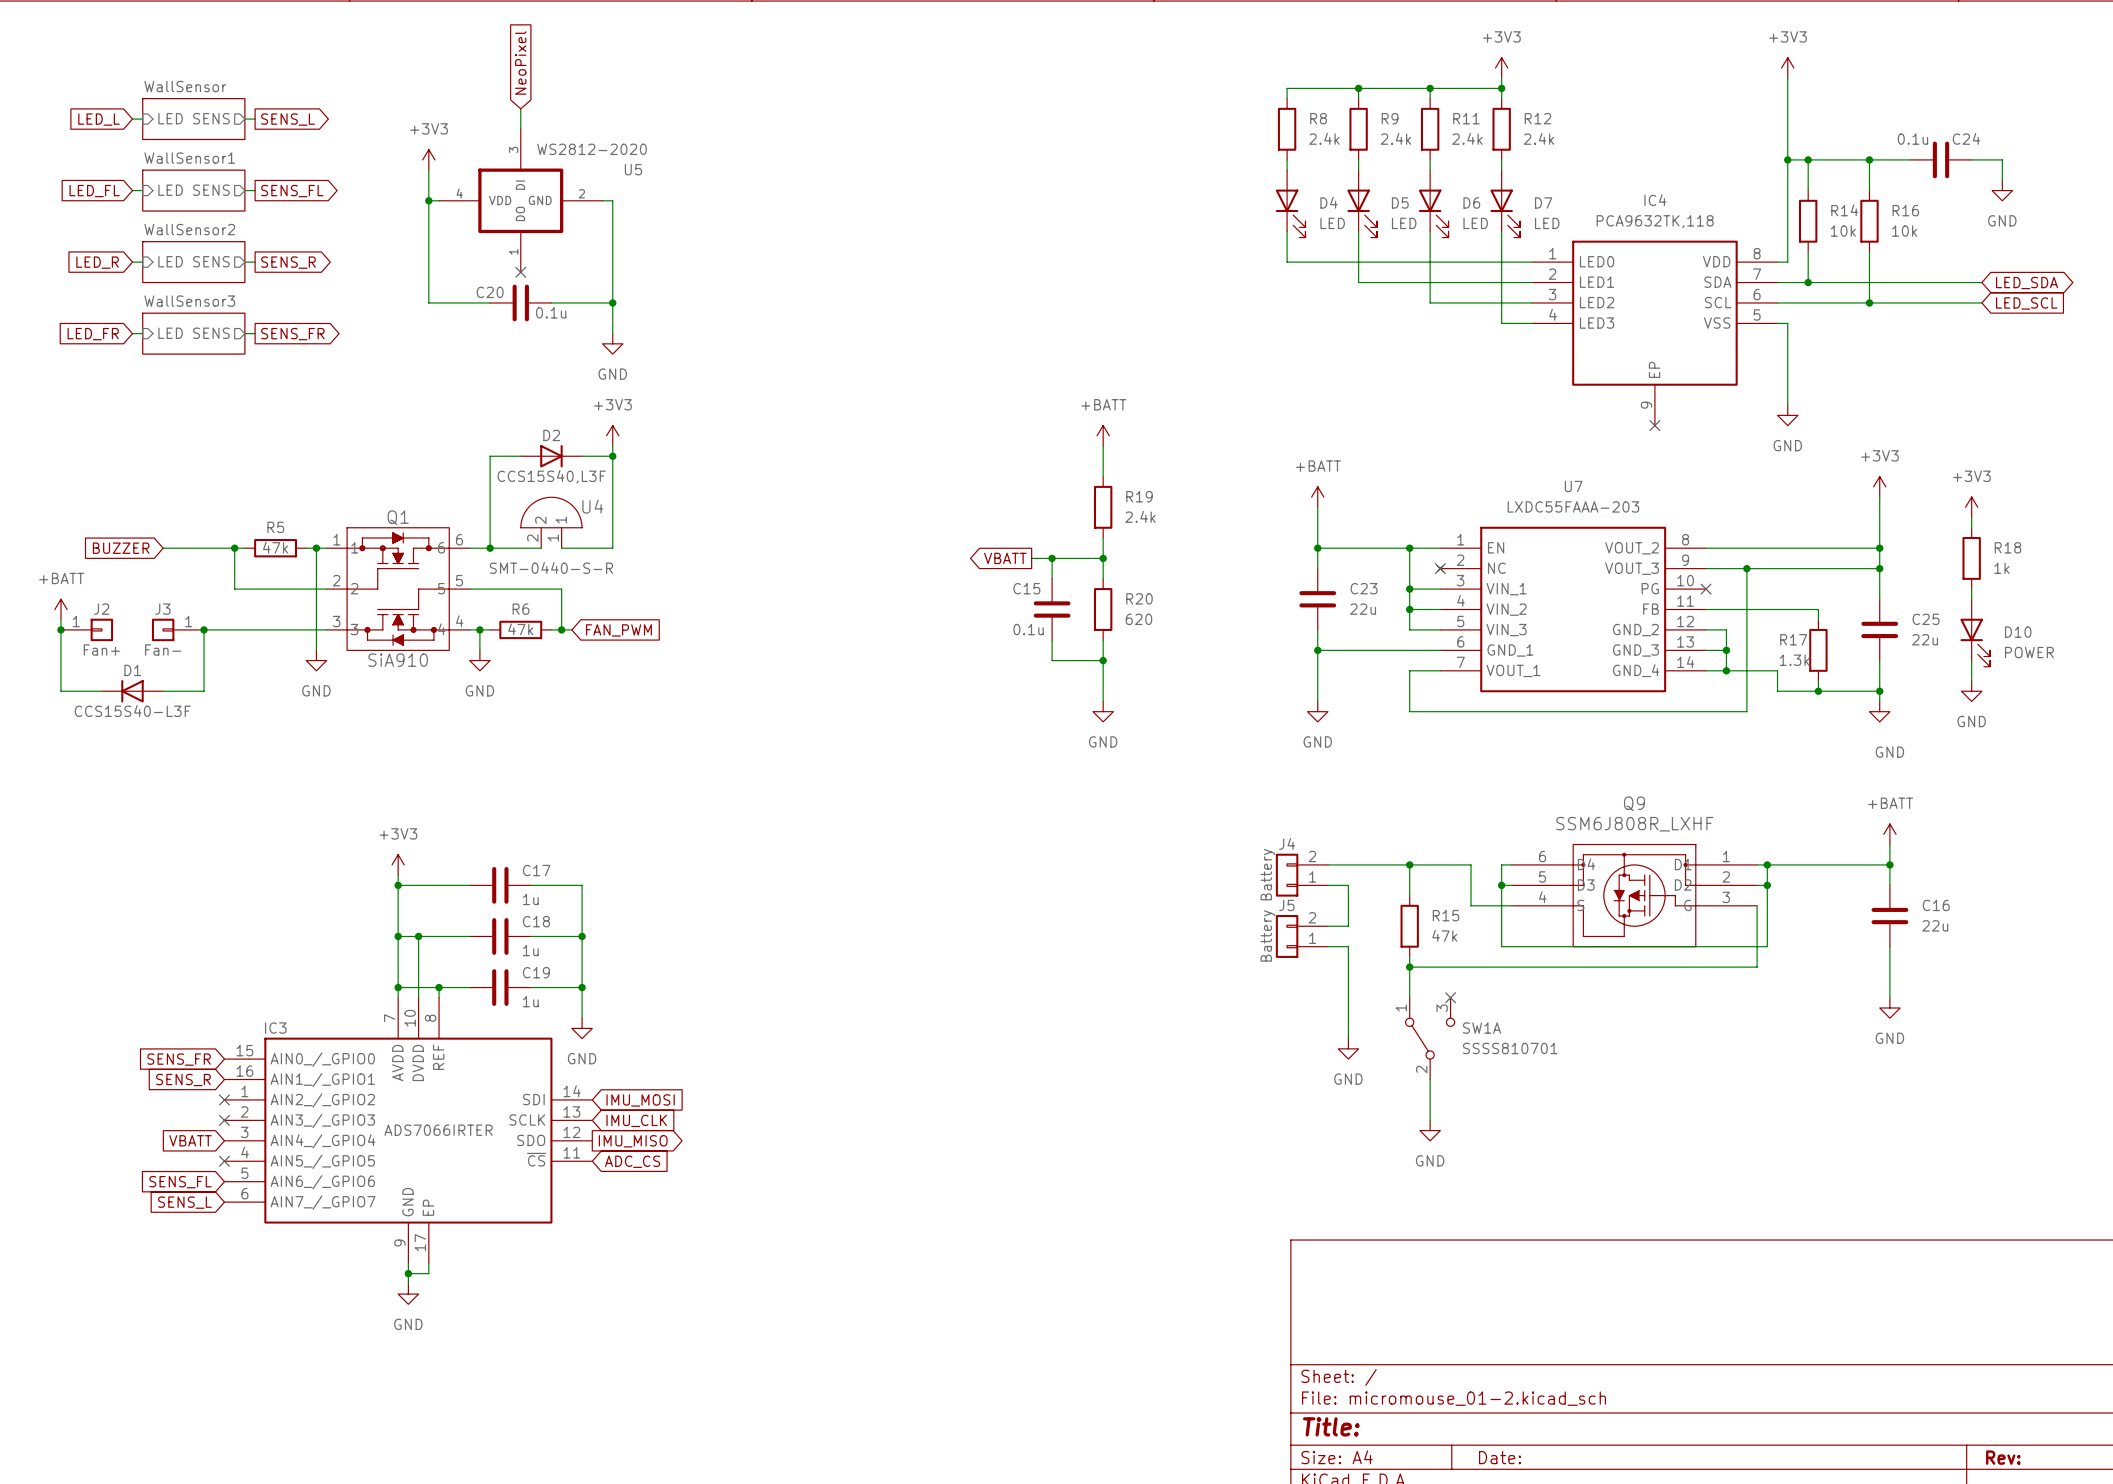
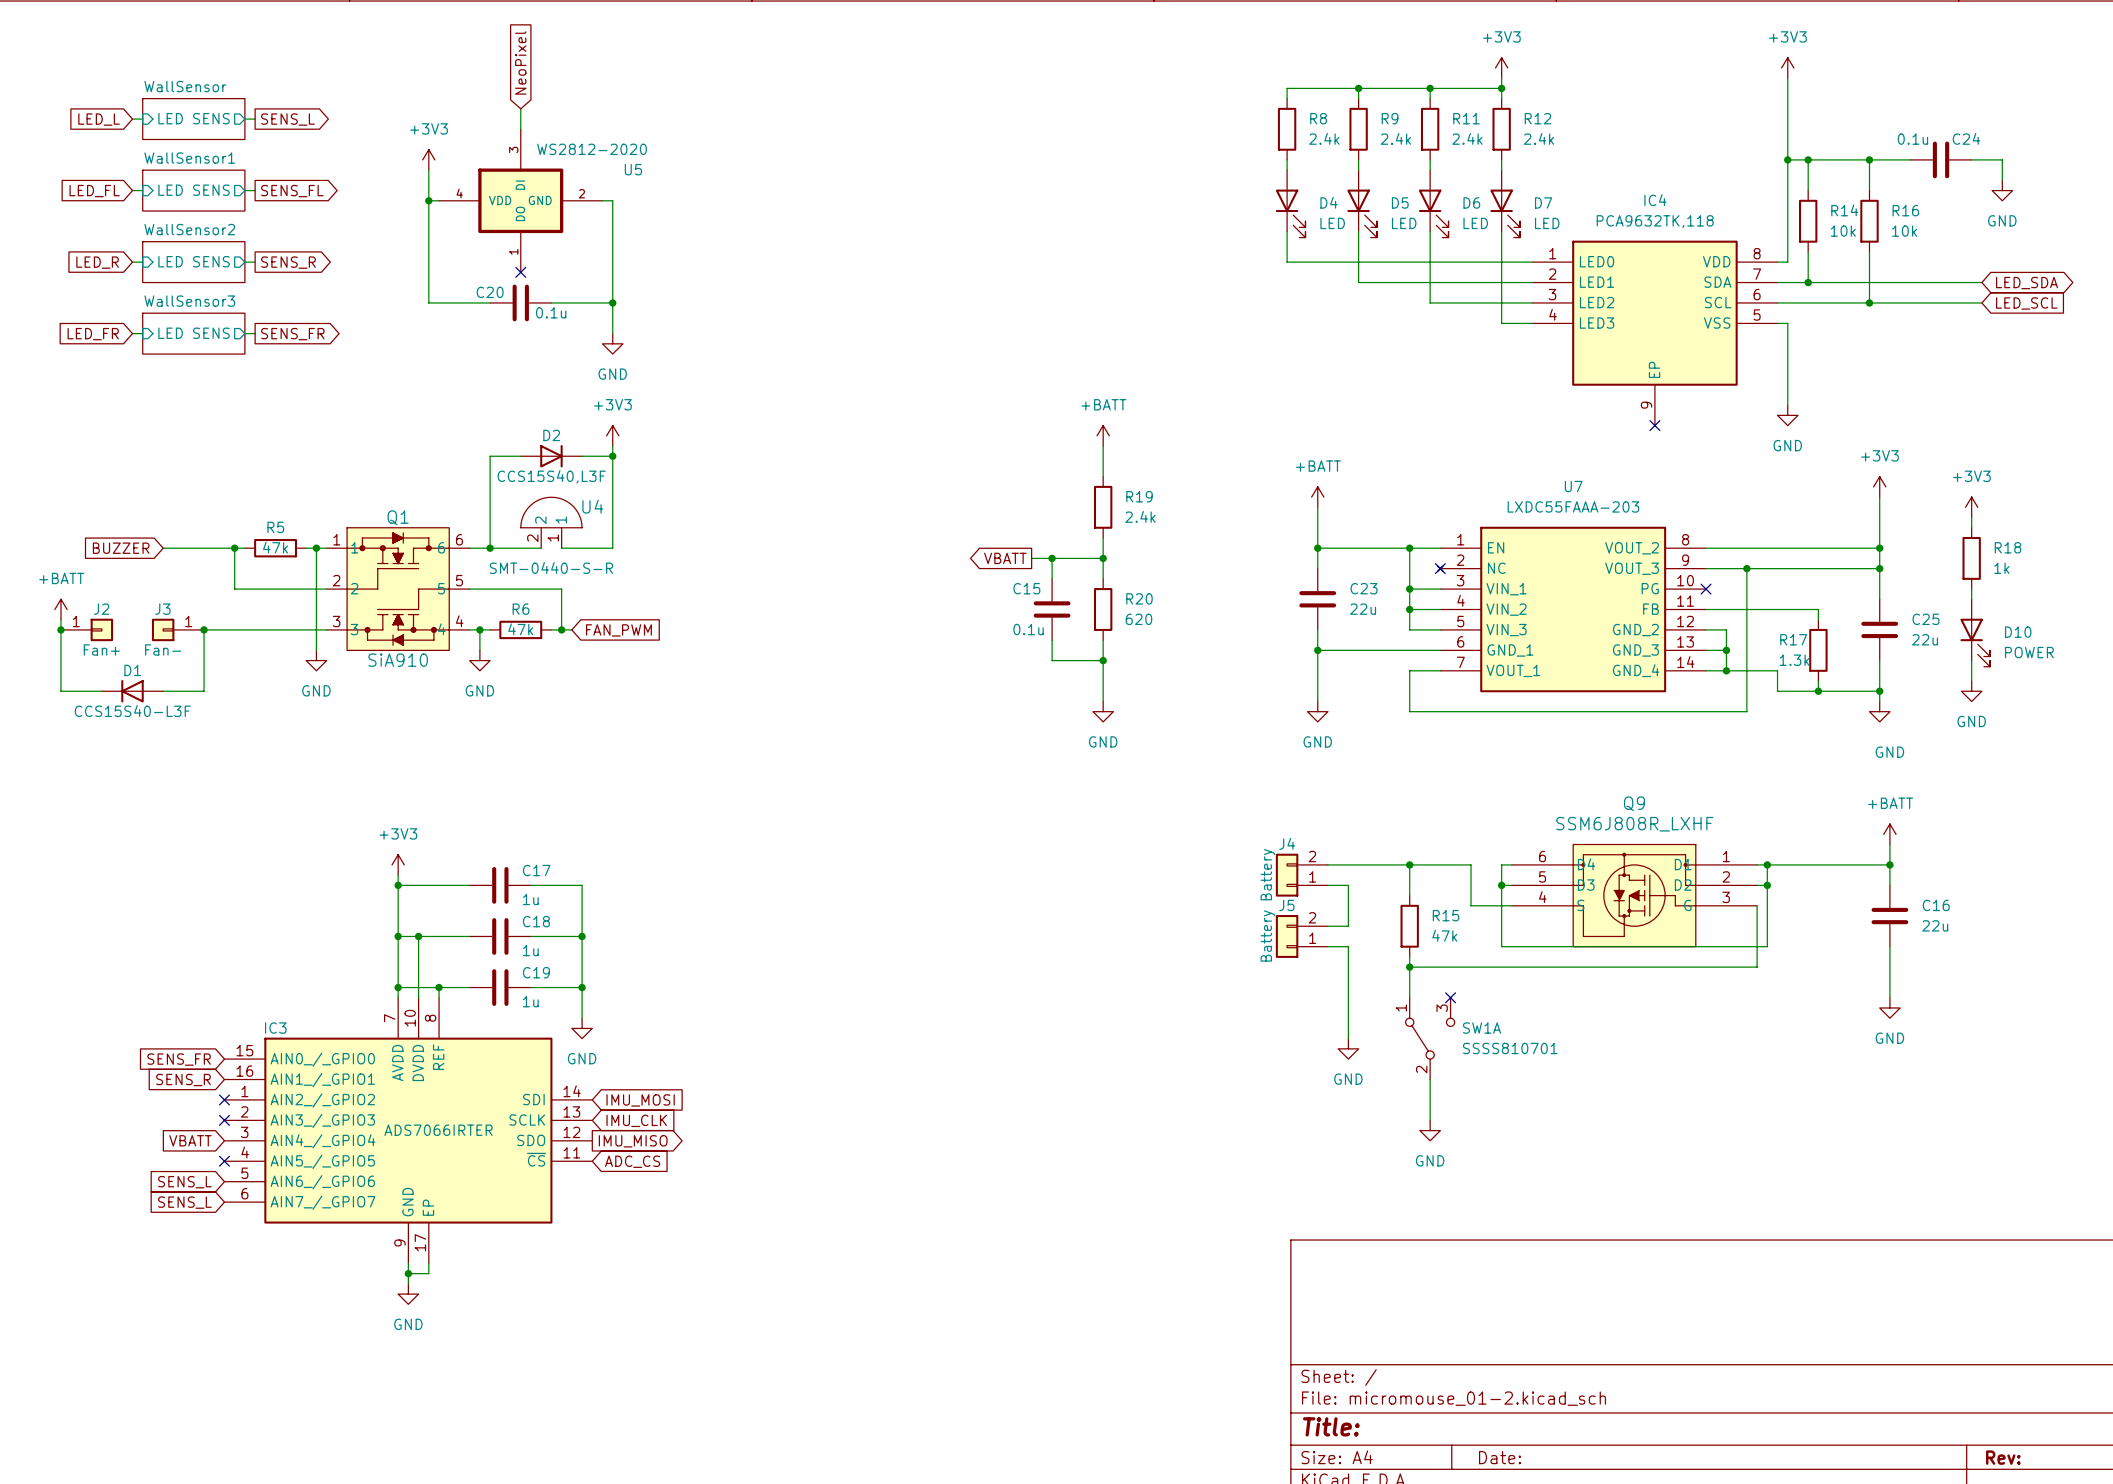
global label: SENS_FL (180, 1182) -> SENS_L (184, 1182)

